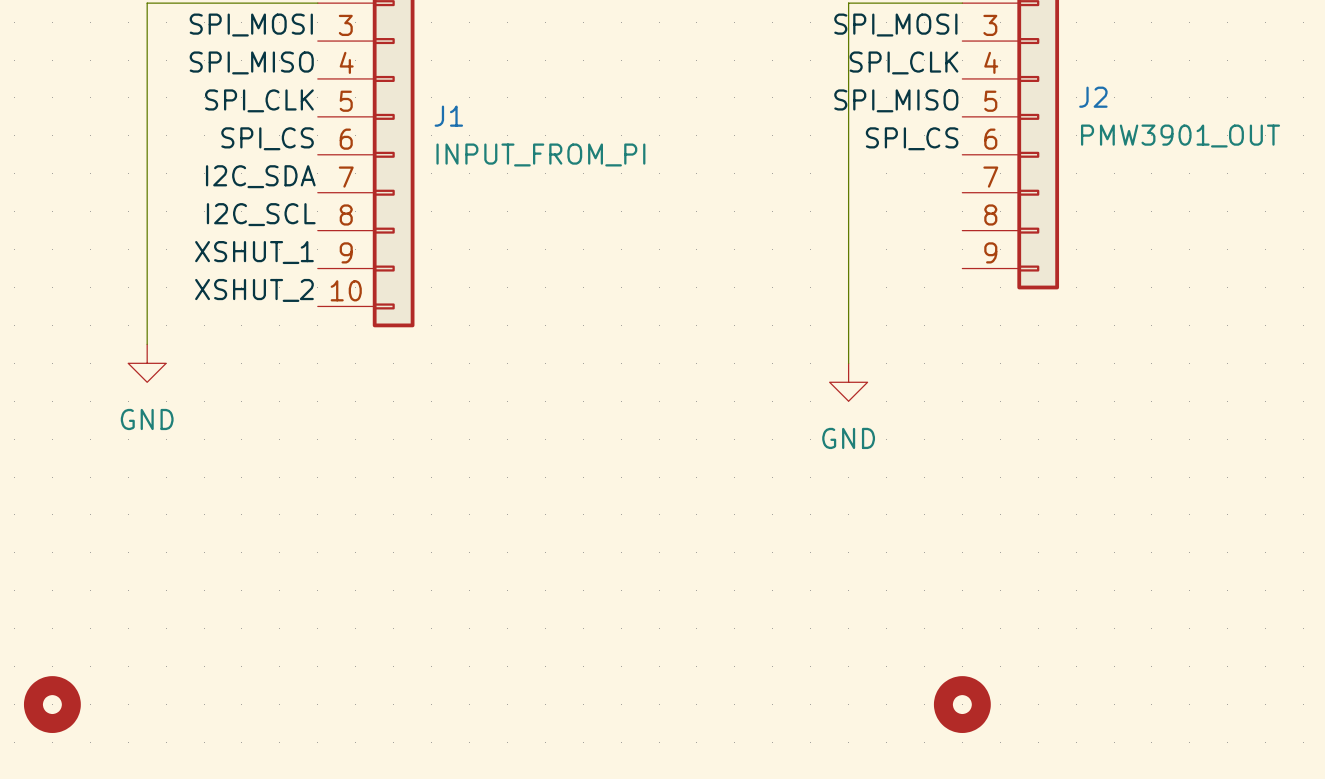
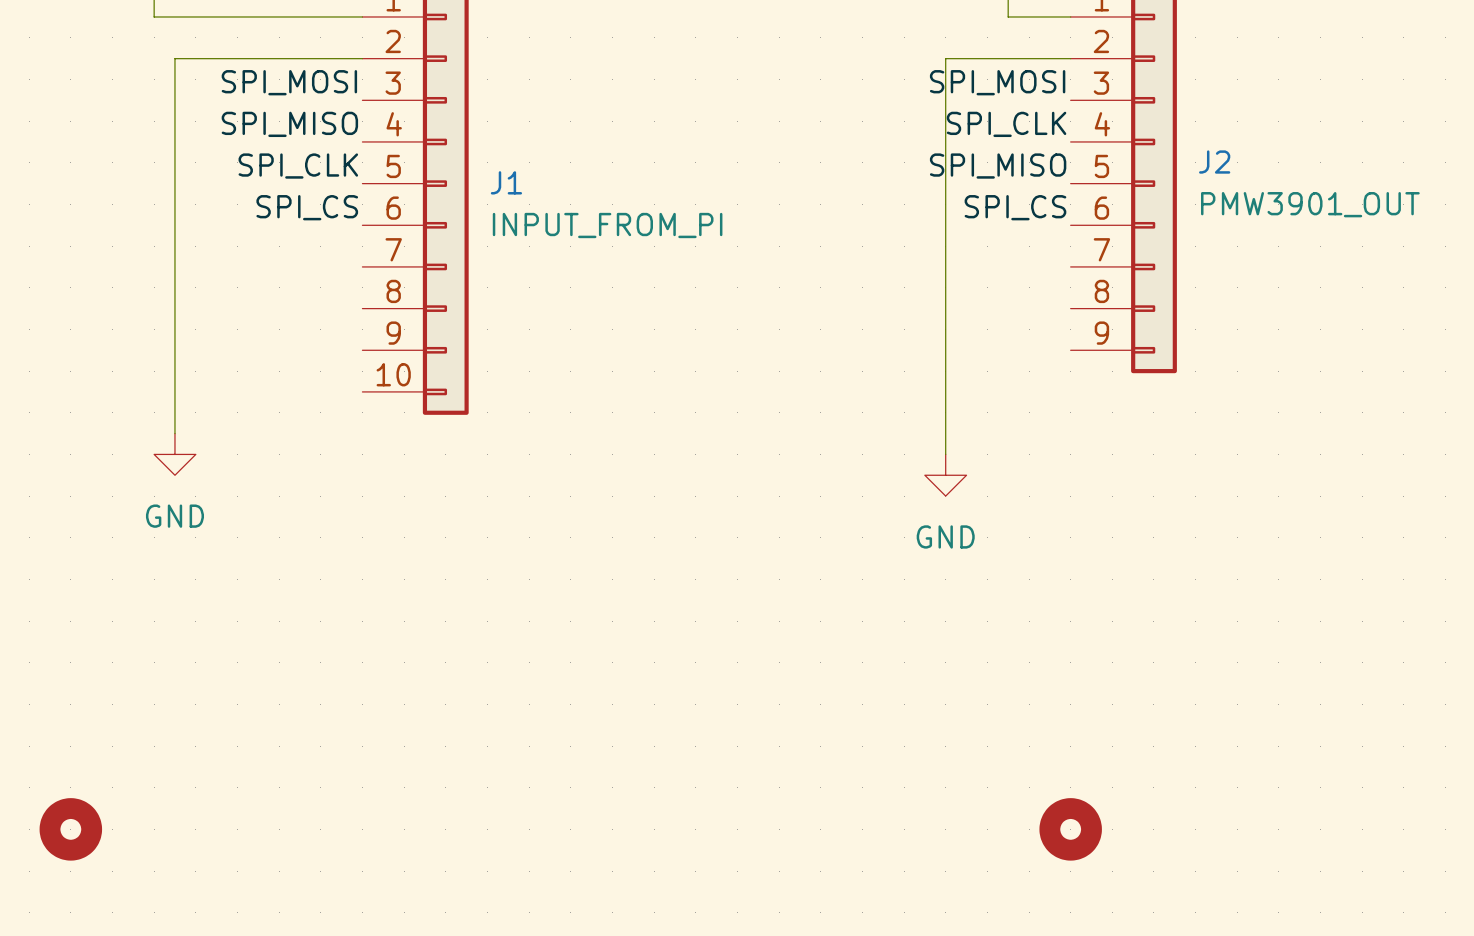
label: I2C_SDA (260, 176) -> none
label: I2C_SCL (261, 214) -> none
label: XSHUT_1 (254, 252) -> none
label: XSHUT_2 (254, 290) -> none

